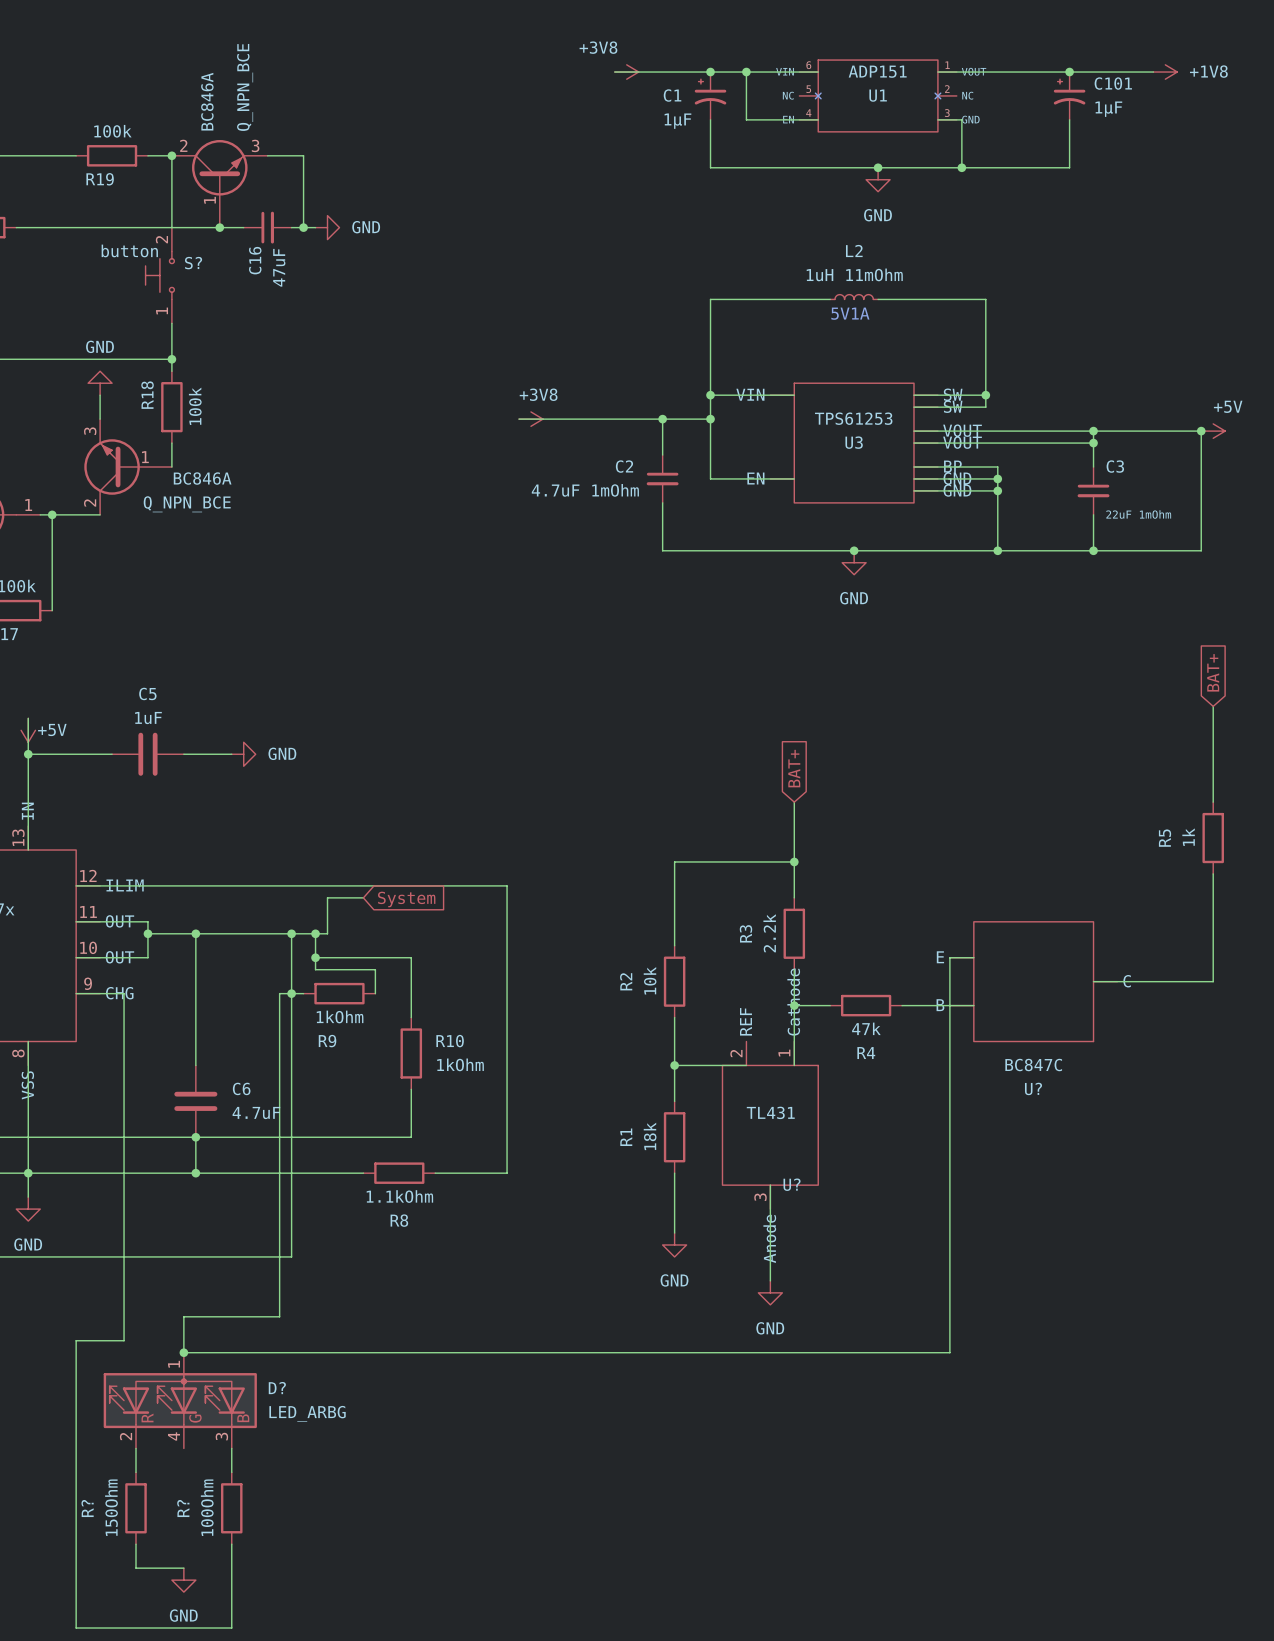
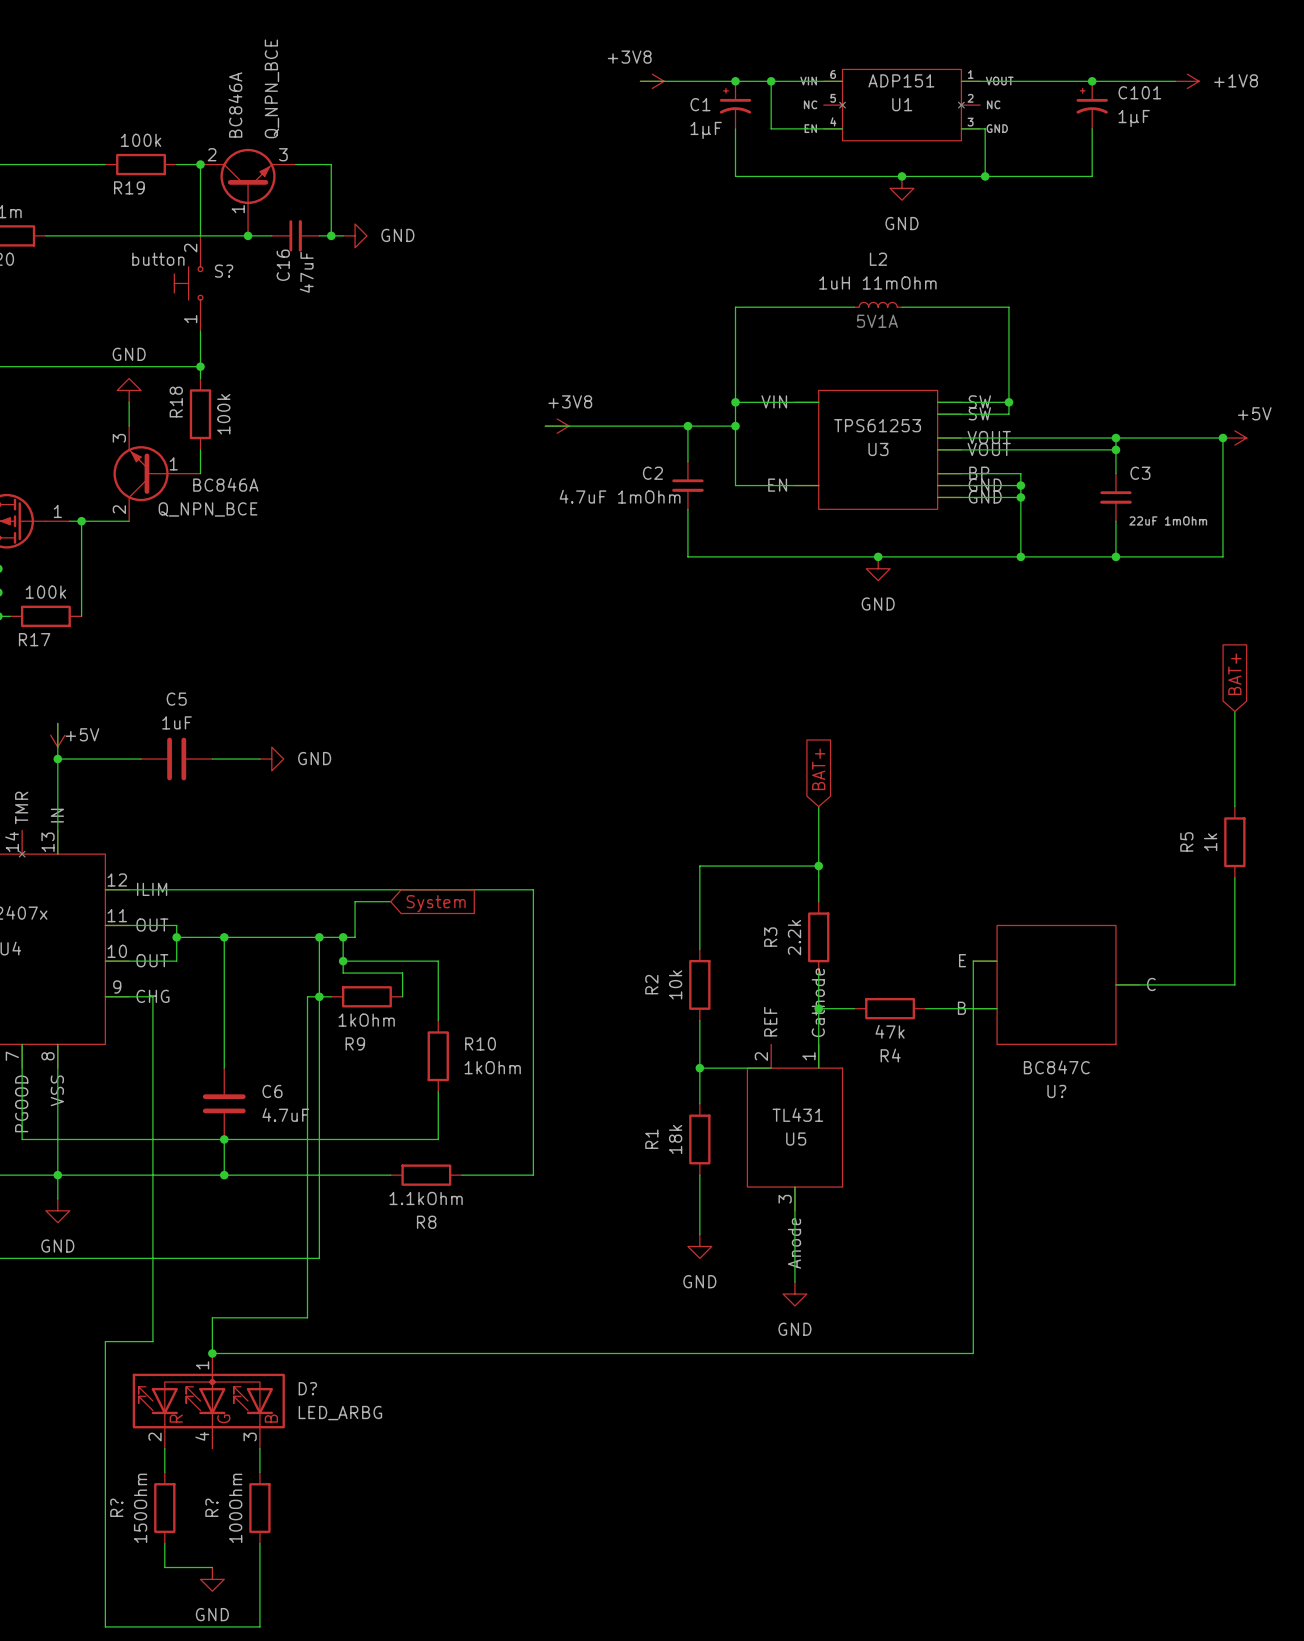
U? name: U? (792, 1184) -> U5 (796, 1139)

